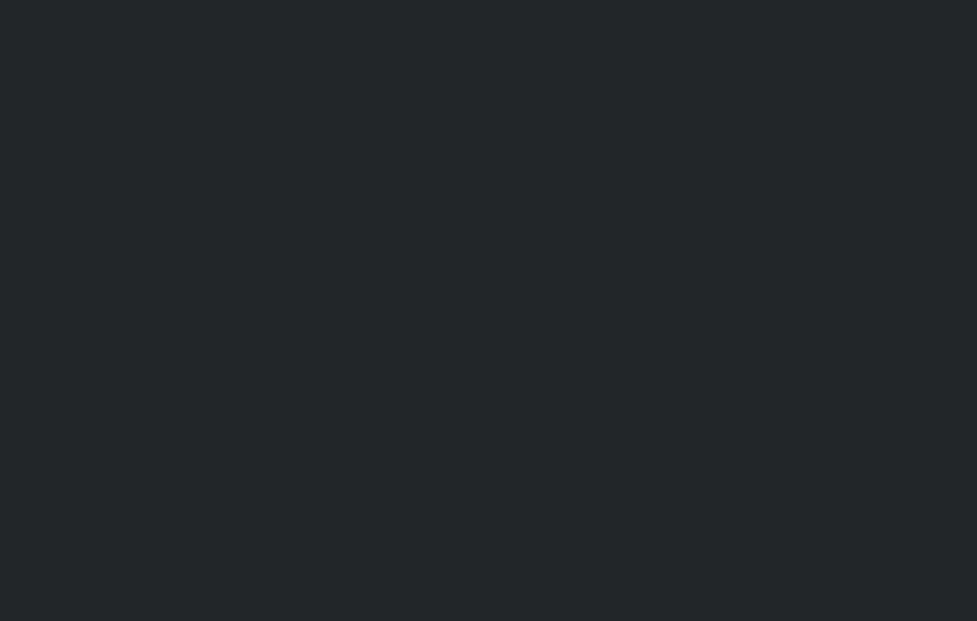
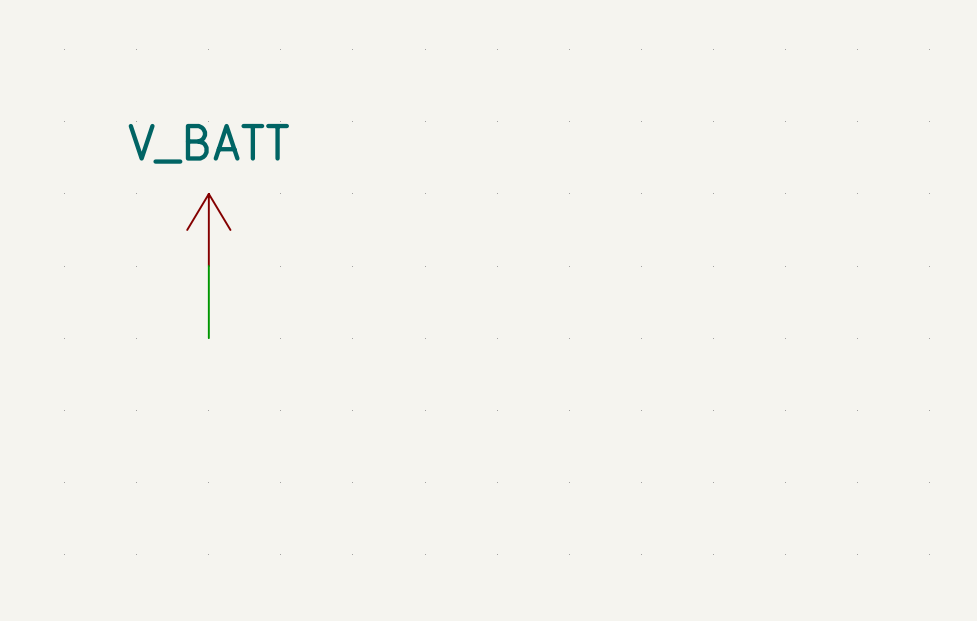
power symbol: none -> V_BATT (208, 229)
wire: none -> (208, 266) (208, 338)

